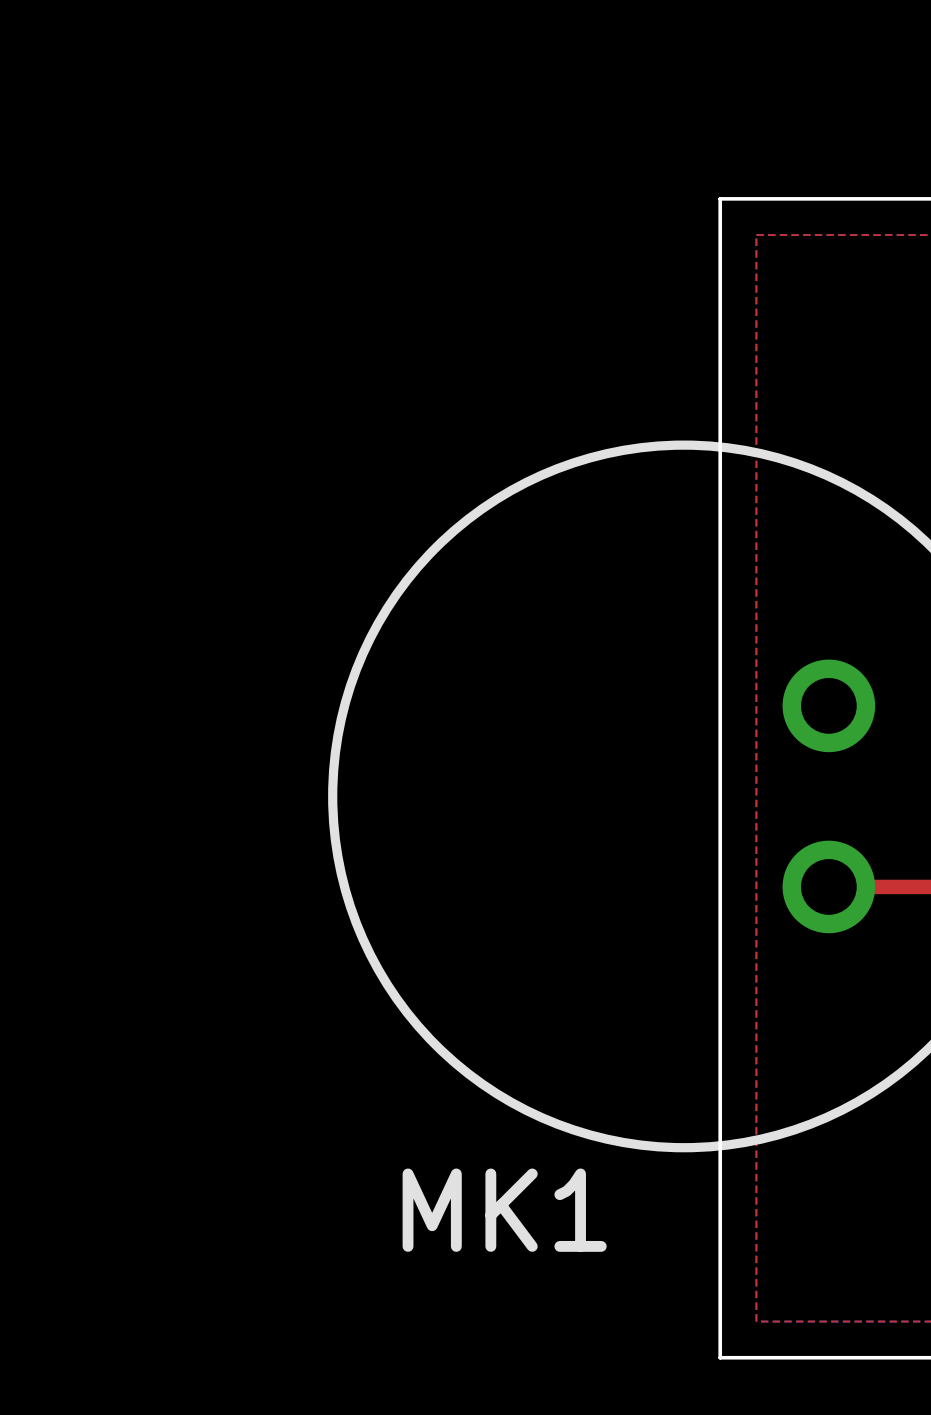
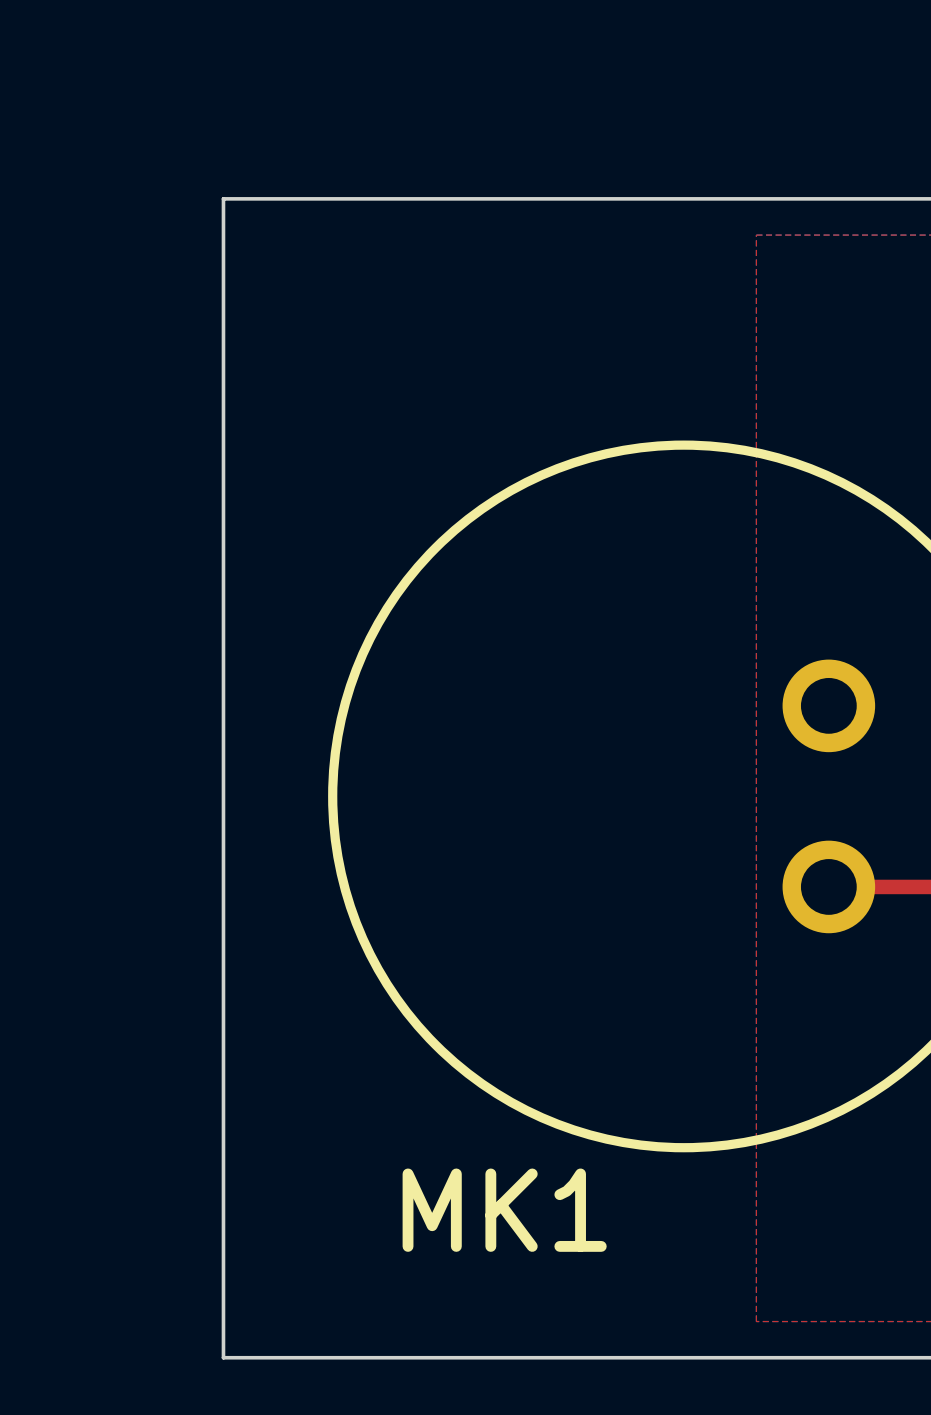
board edge: (720, 198) (720, 1357) -> (720, 198) (223, 198) (223, 1357) (720, 1357)

